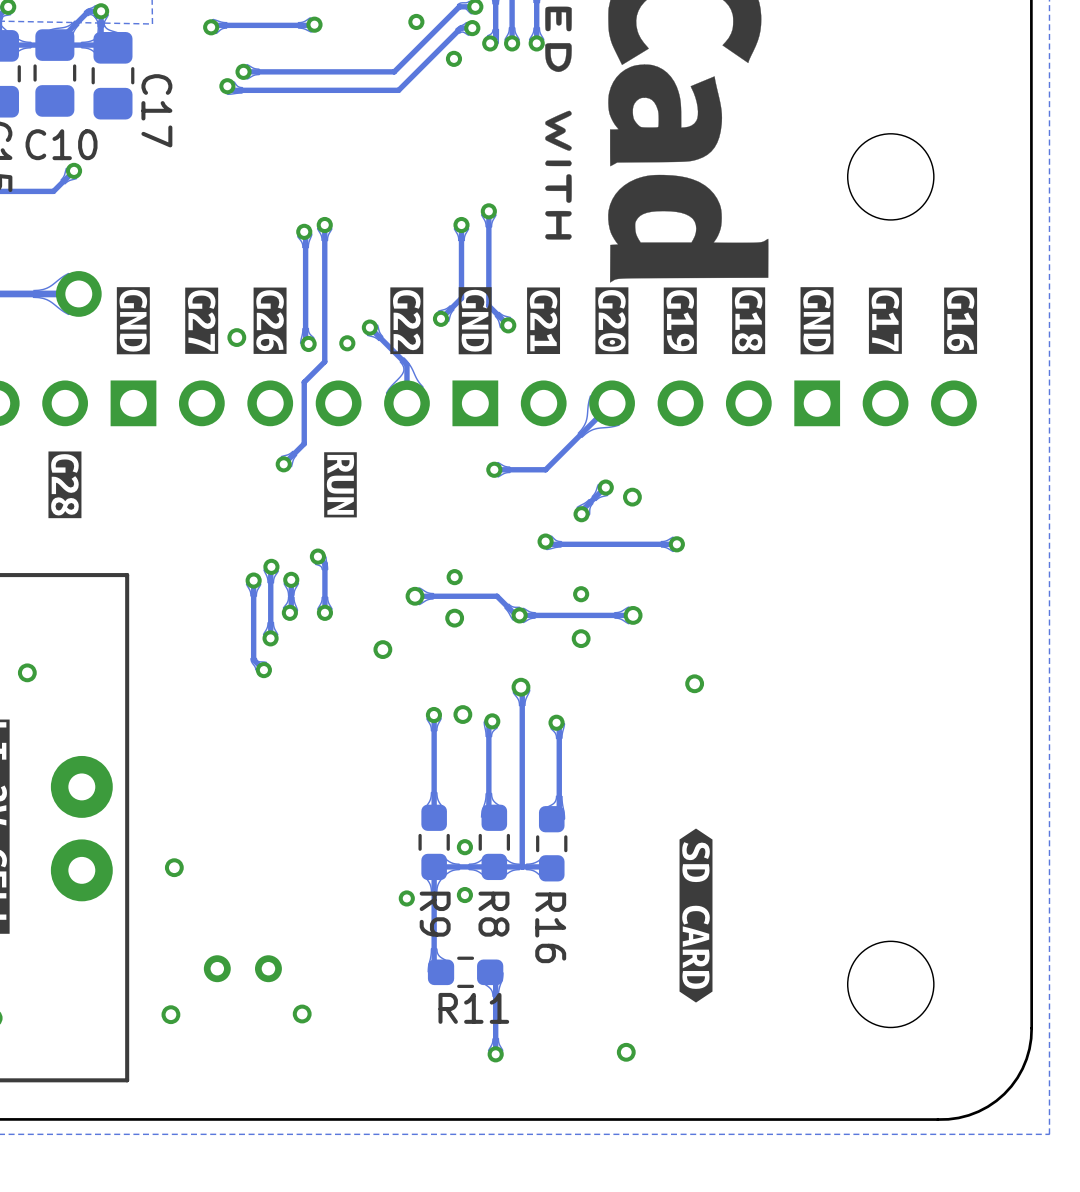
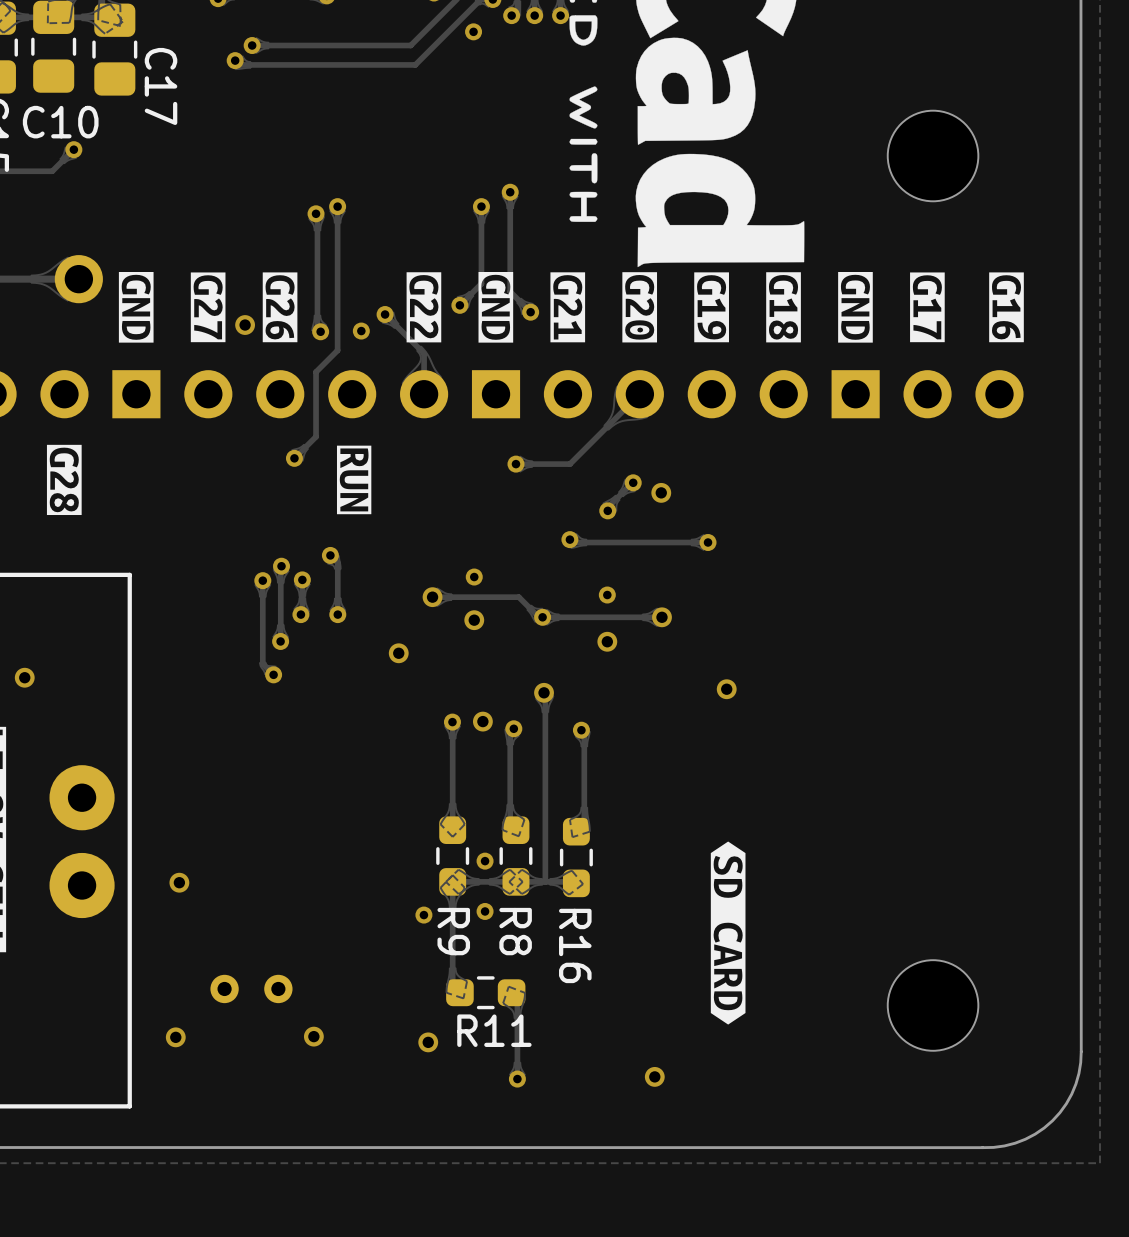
via: none -> (428, 1042)

